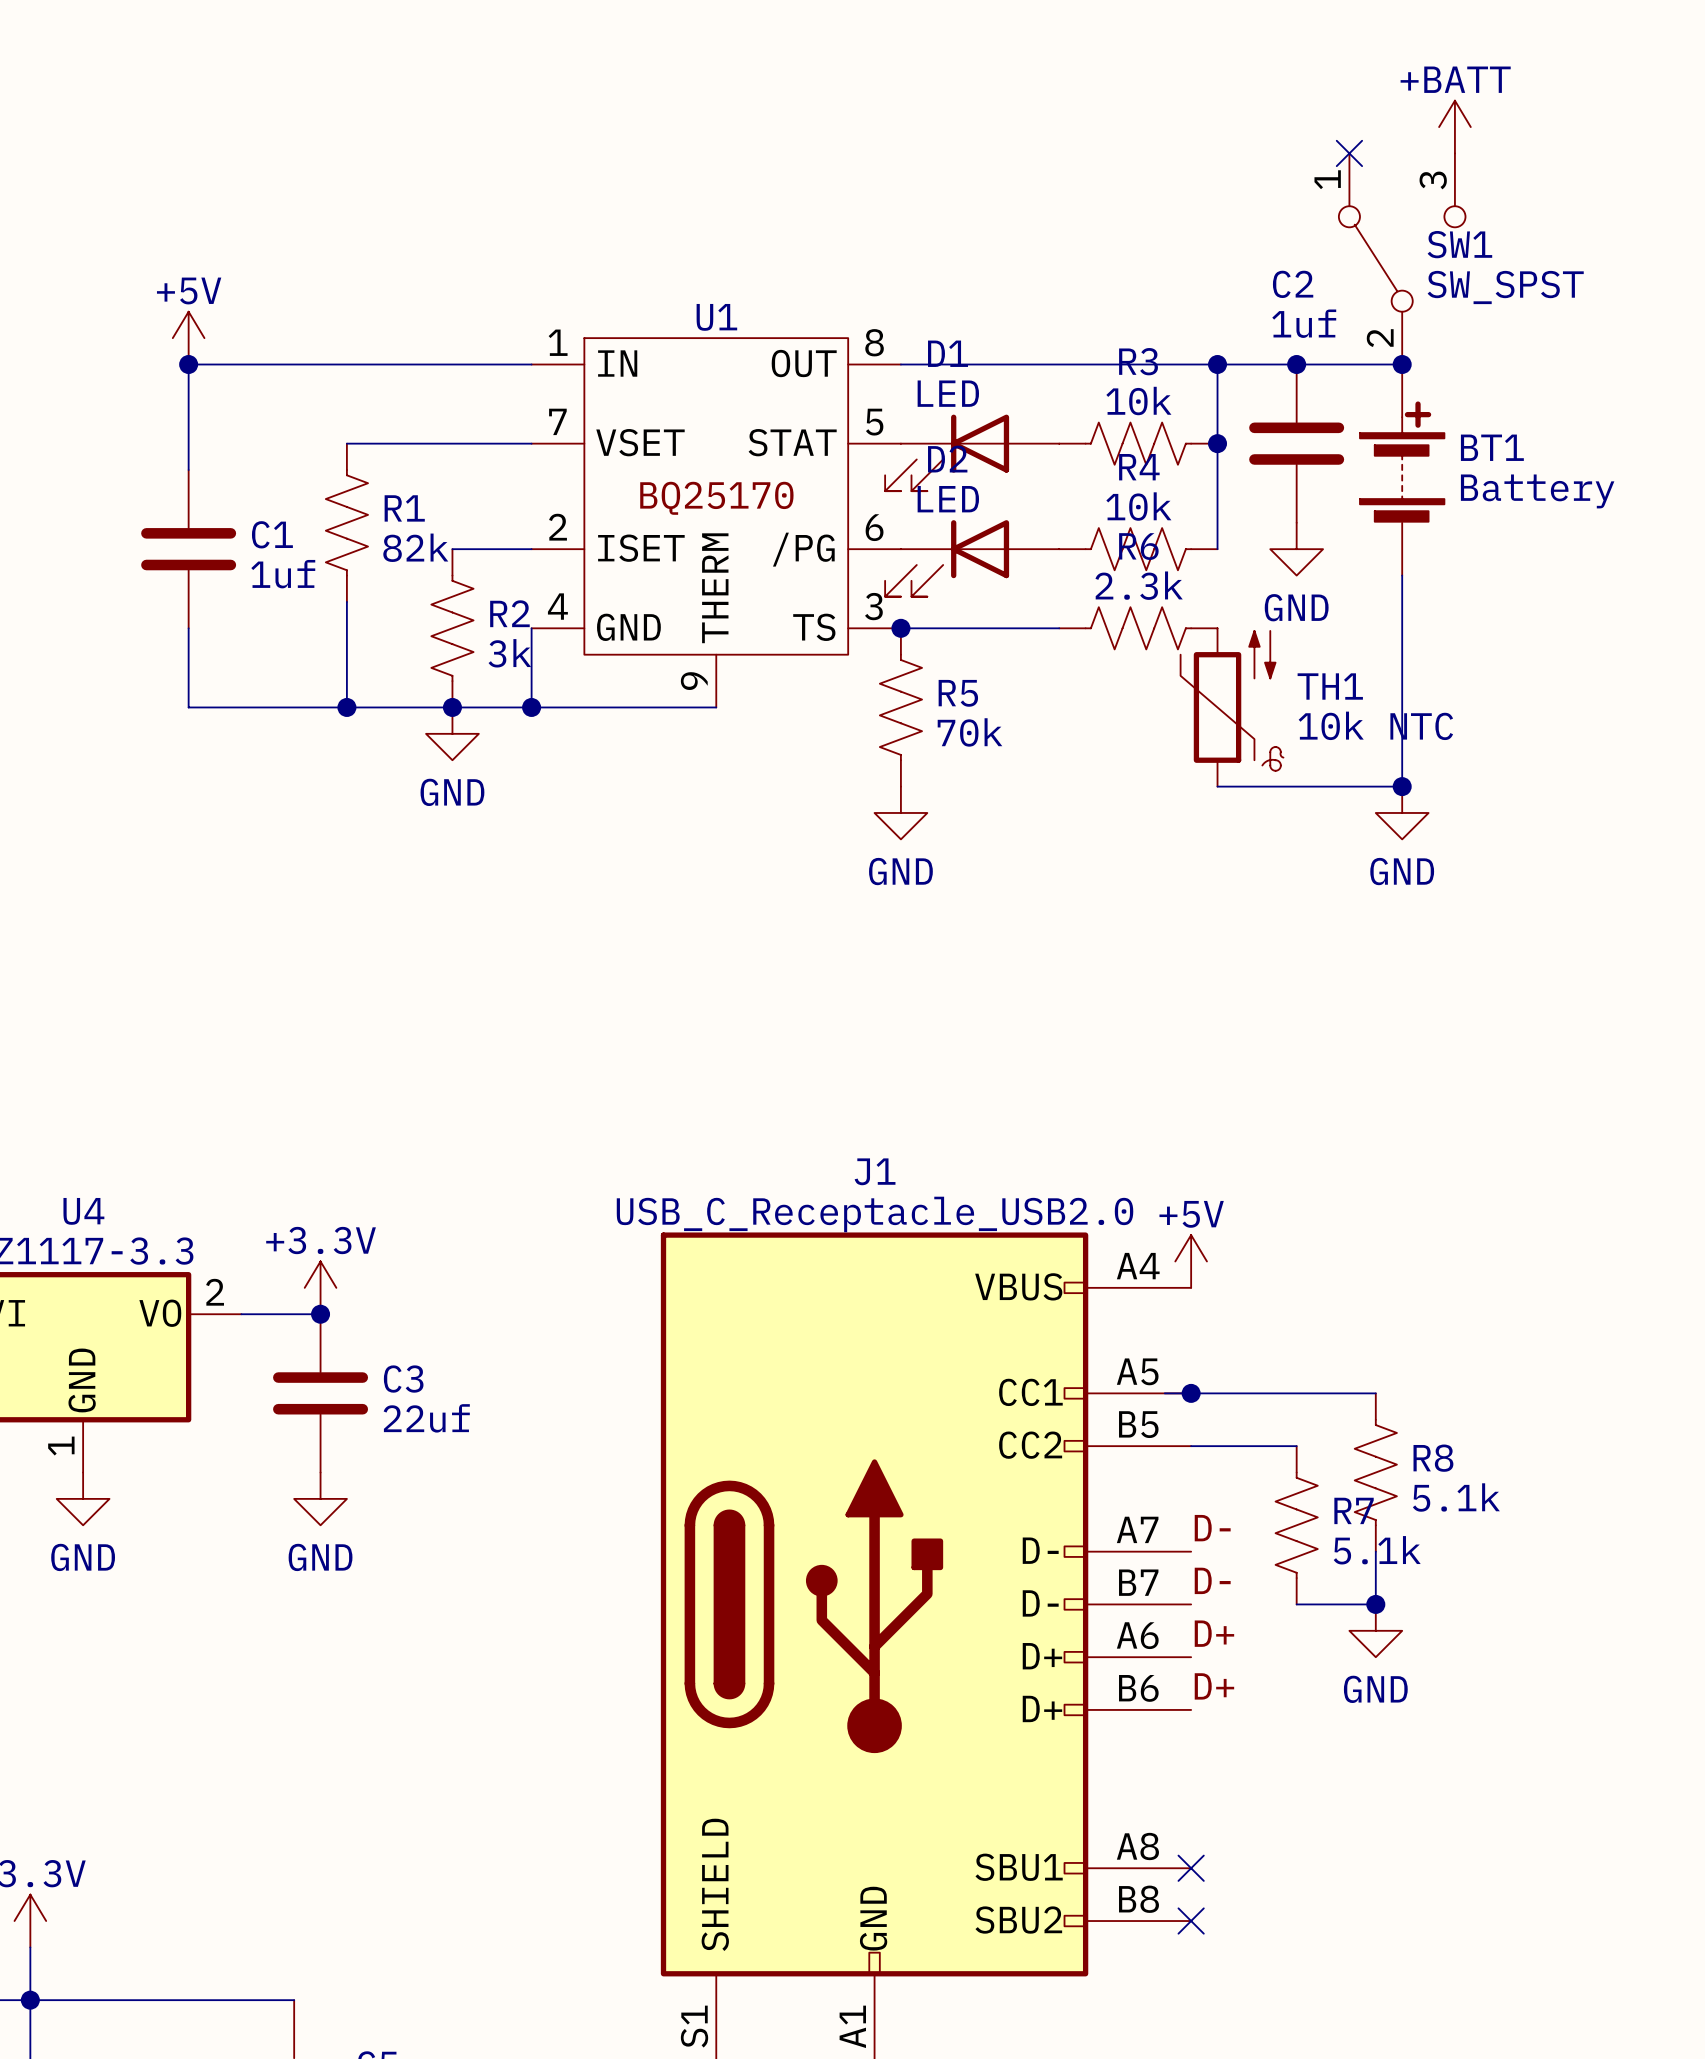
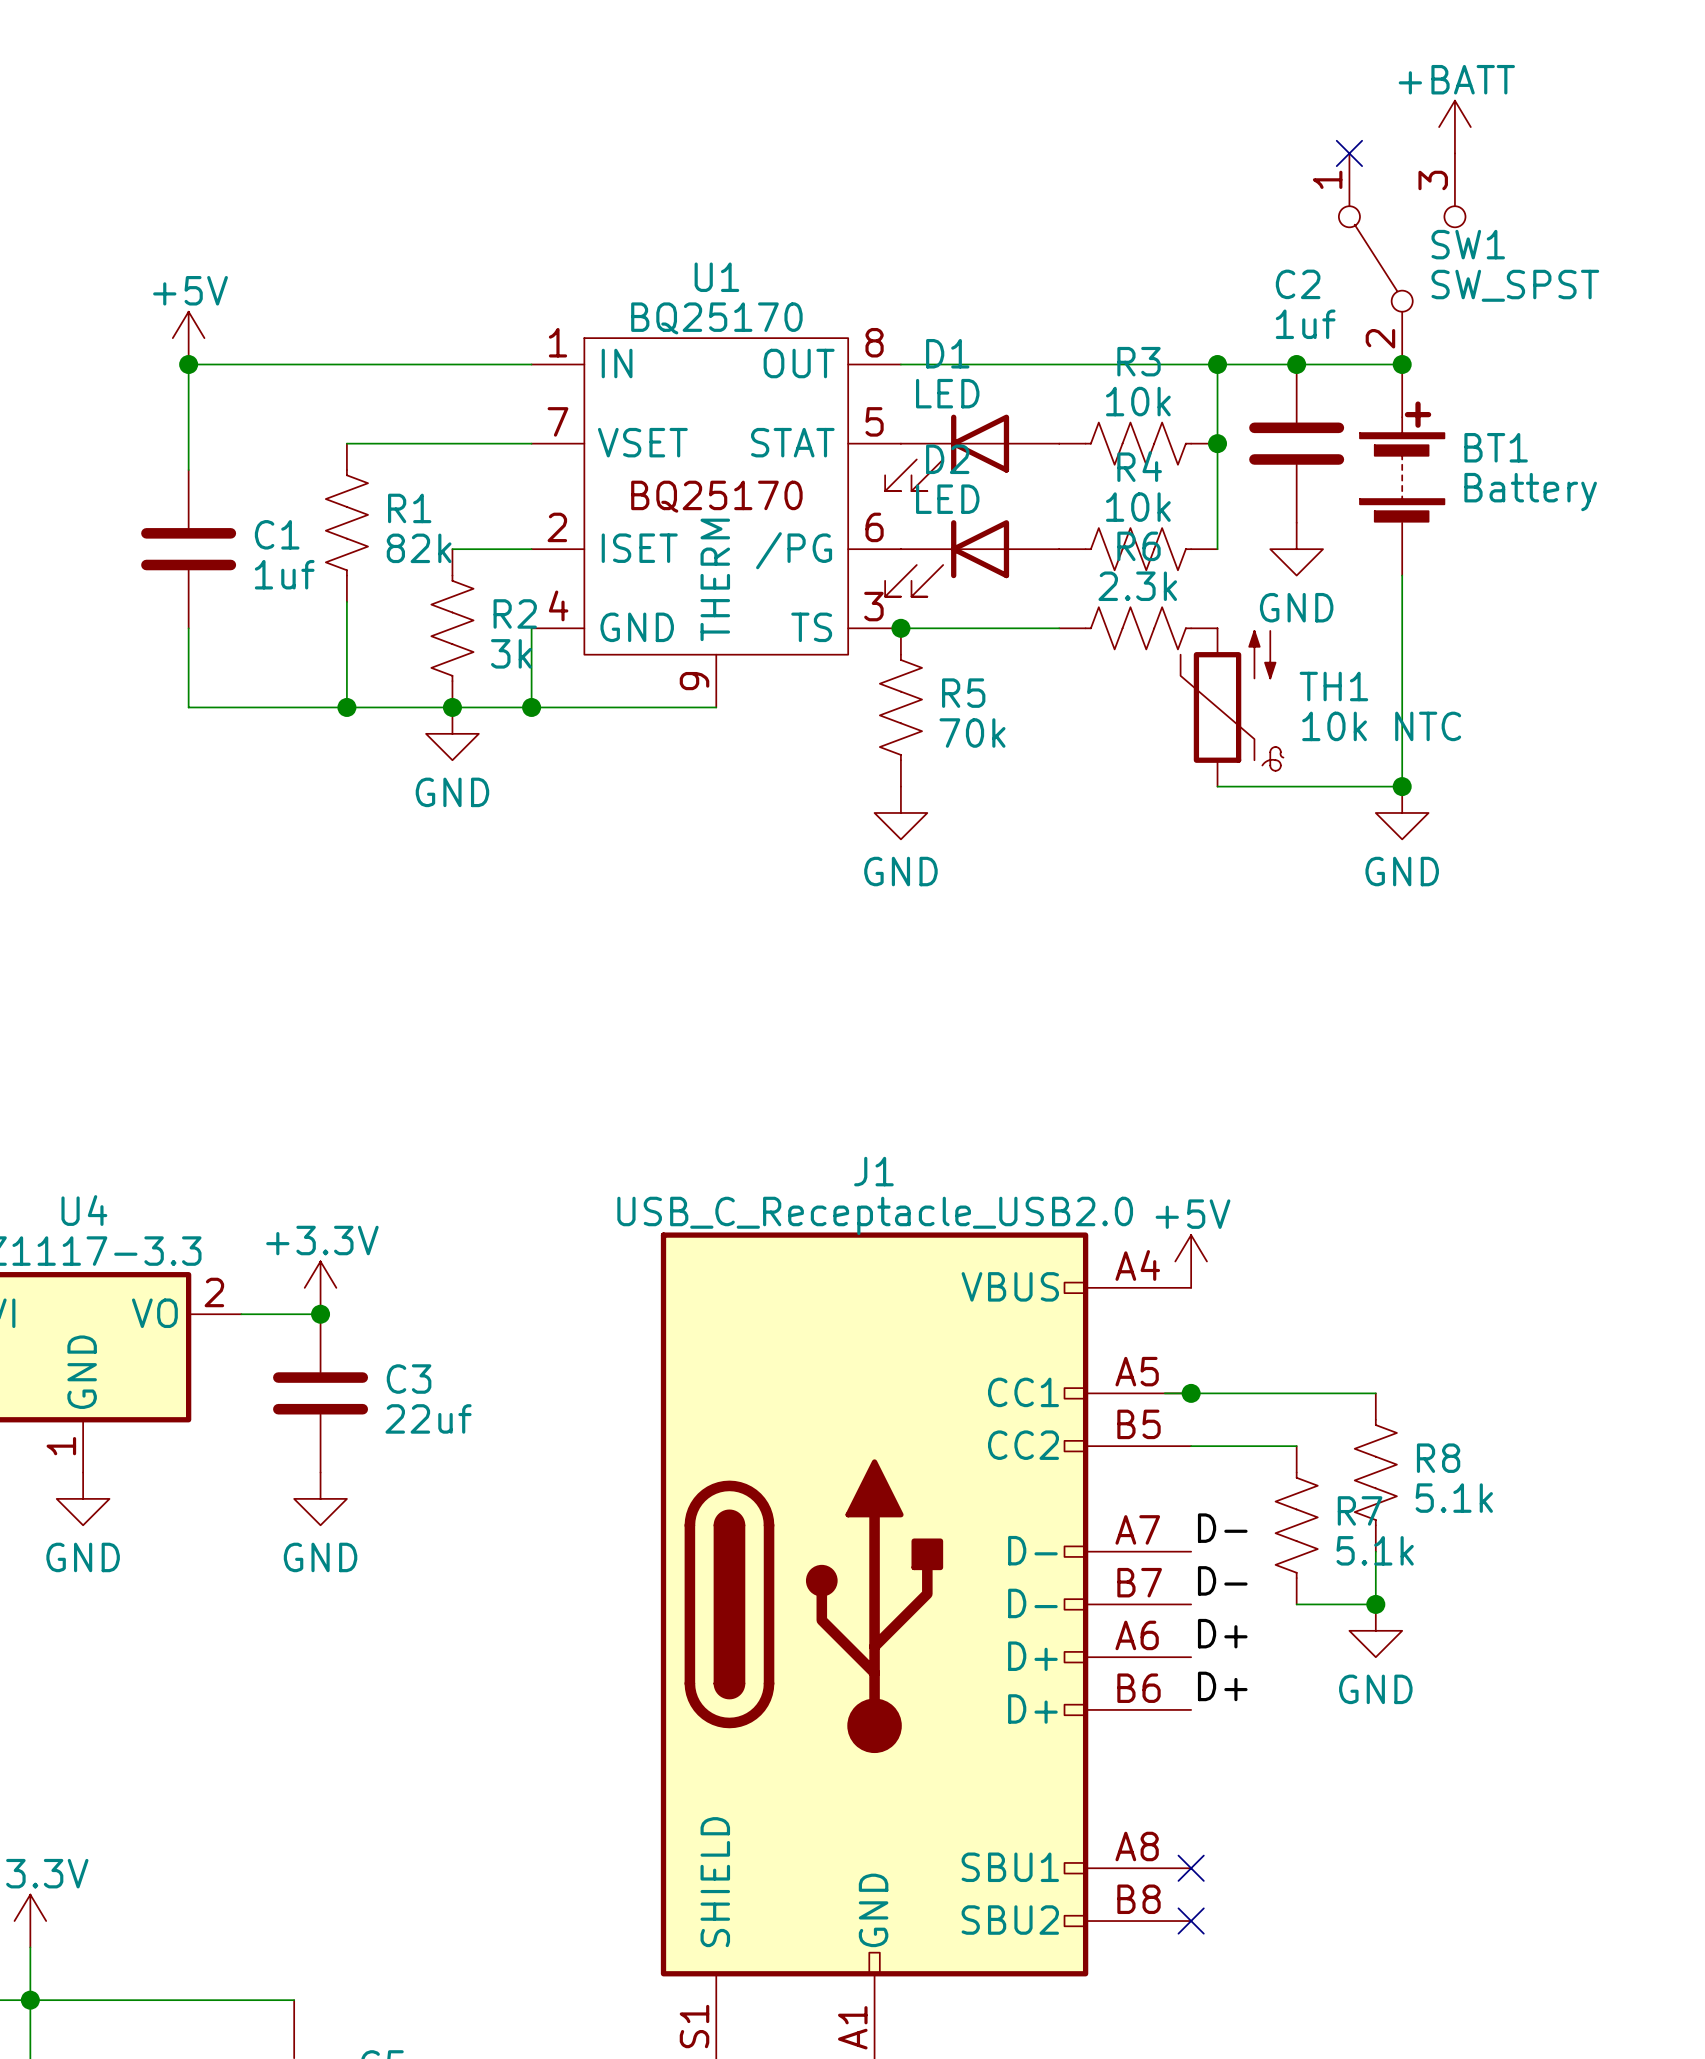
U1 name position: U1 (716, 317) -> U1 (716, 277)
U1 value: none -> BQ25170 (716, 318)

